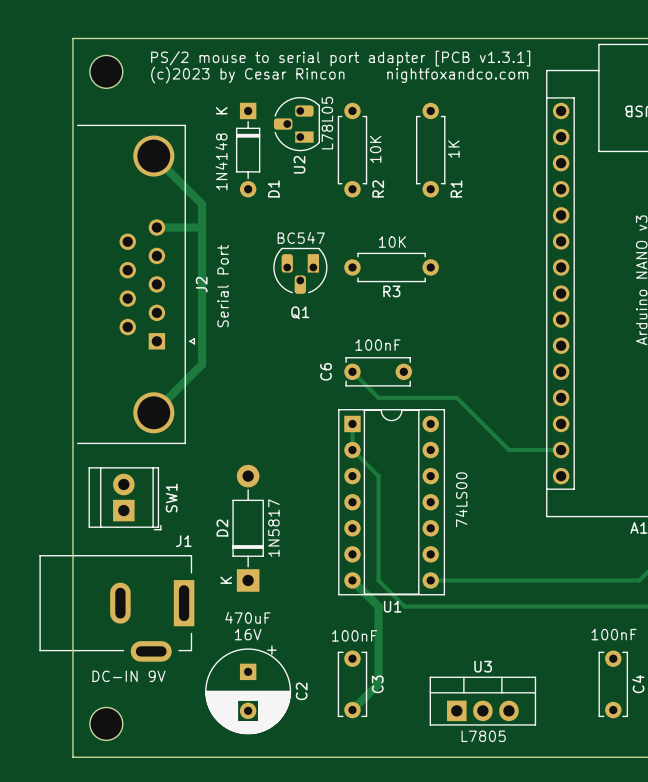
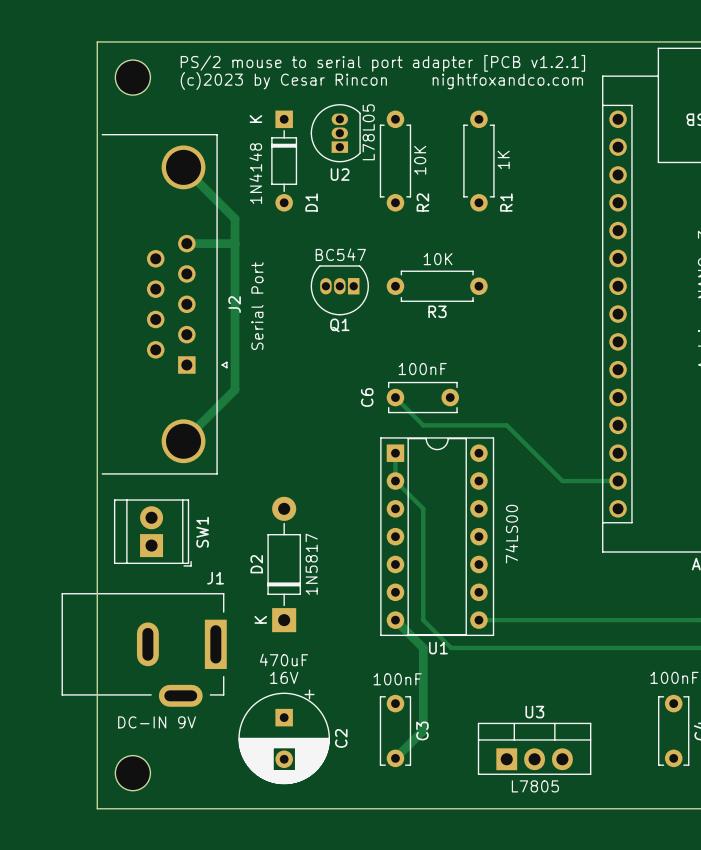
text: PS/2 mouse to serial port adapter [PCB v1.3.1] (340, 58) -> PS/2 mouse to serial port adapter [PCB v1.2.1] (382, 63)
U2 footprint: [273, 97, 320, 152] -> [310, 104, 361, 163]
Q1 footprint: [273, 247, 328, 294] -> [310, 265, 369, 316]

